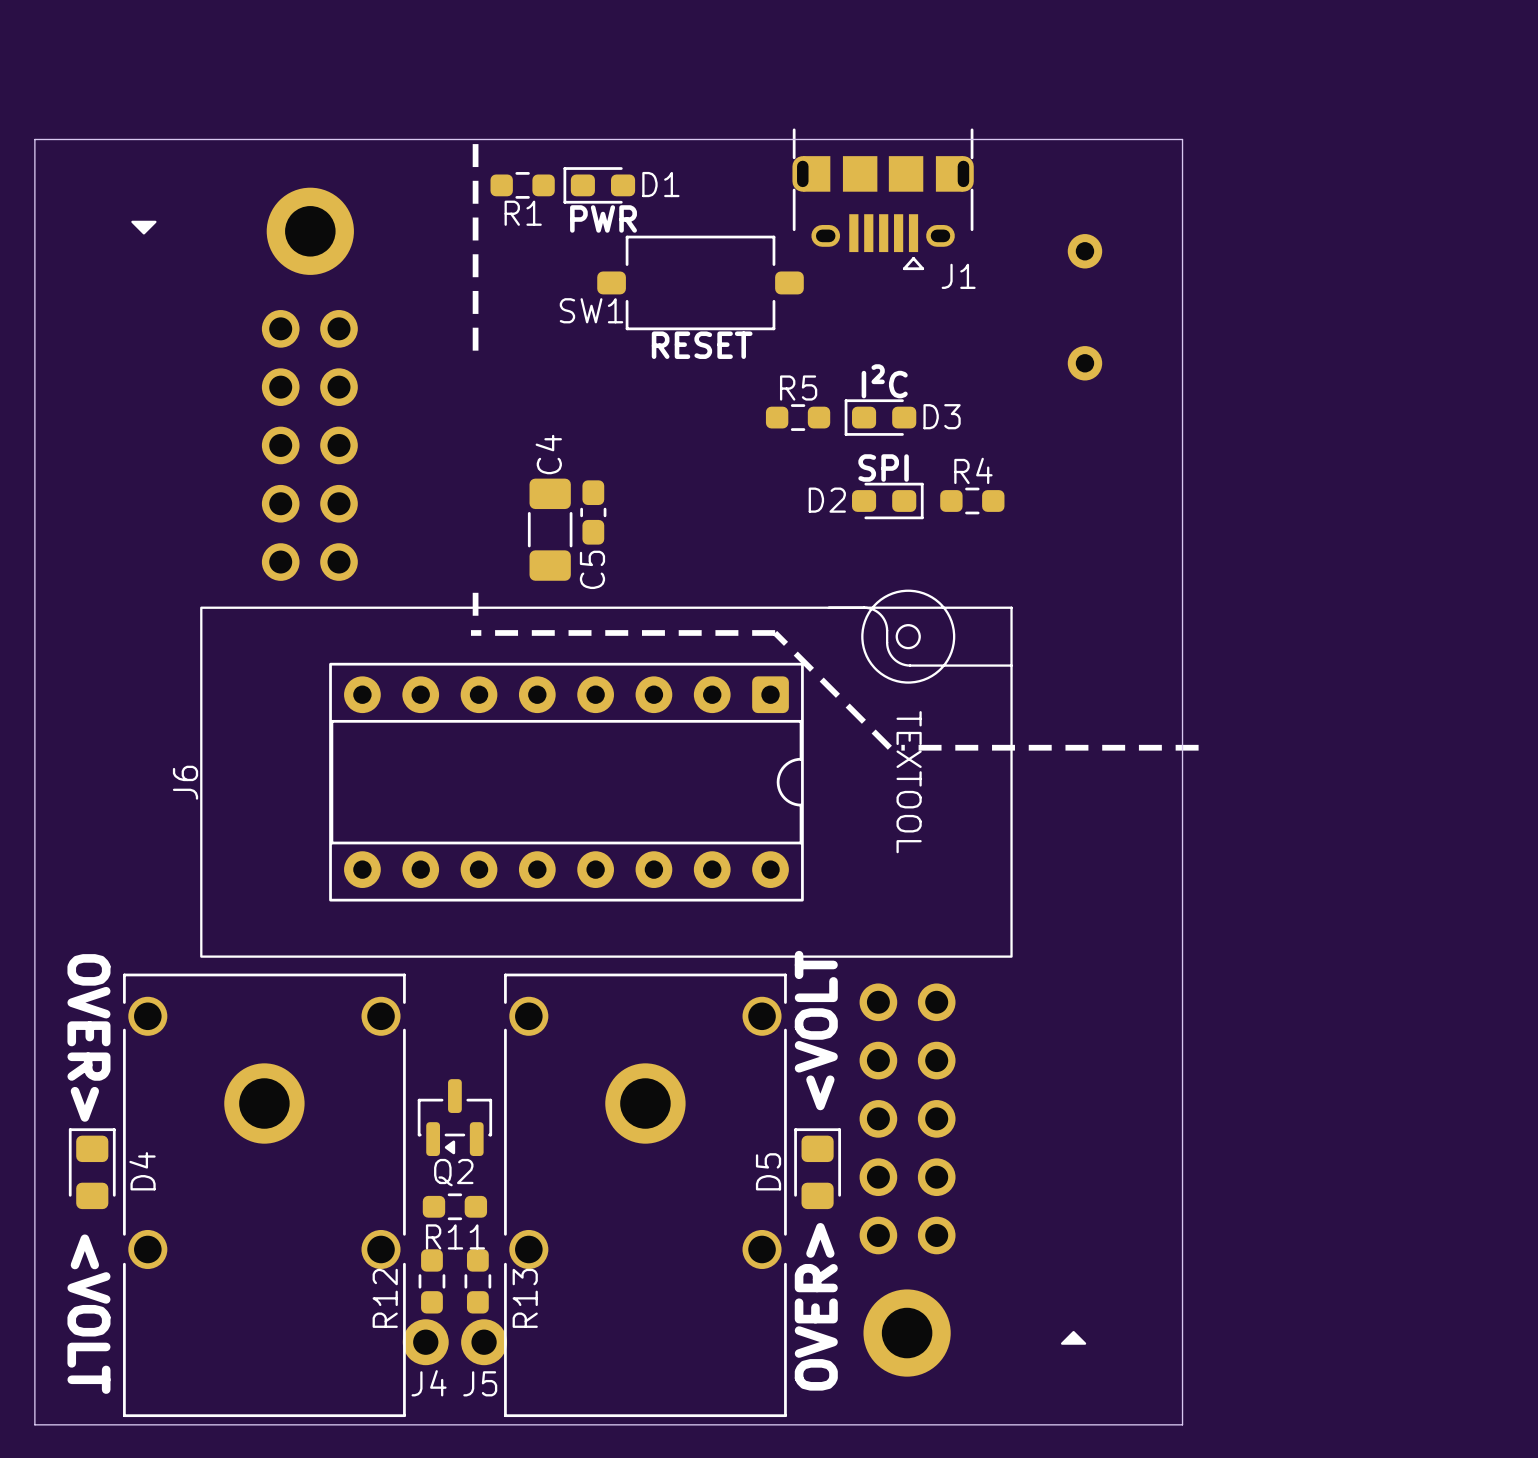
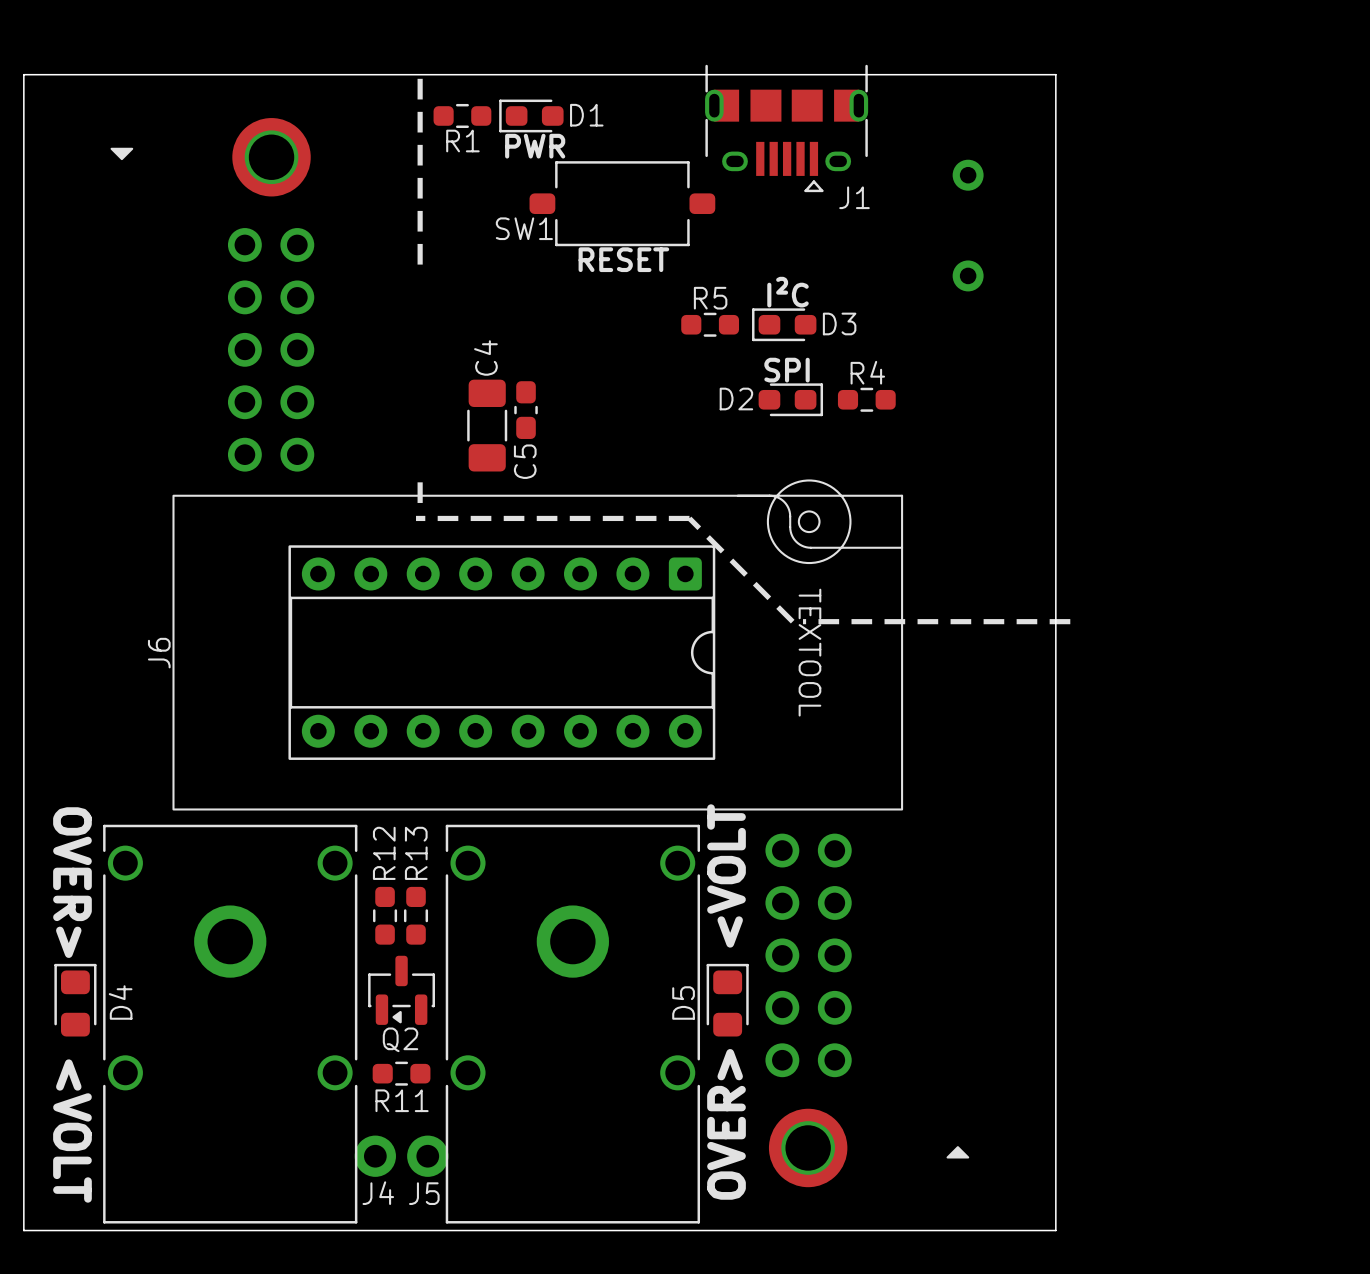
Q2 position: (454, 1117) -> (401, 990)
R11 position: (454, 1206) -> (401, 1073)
R12 position: (431, 1281) -> (385, 915)
R13 position: (477, 1281) -> (416, 915)
R12 name position: R12 (385, 1298) -> R12 (384, 853)
R13 name position: R13 (525, 1298) -> R13 (416, 853)

